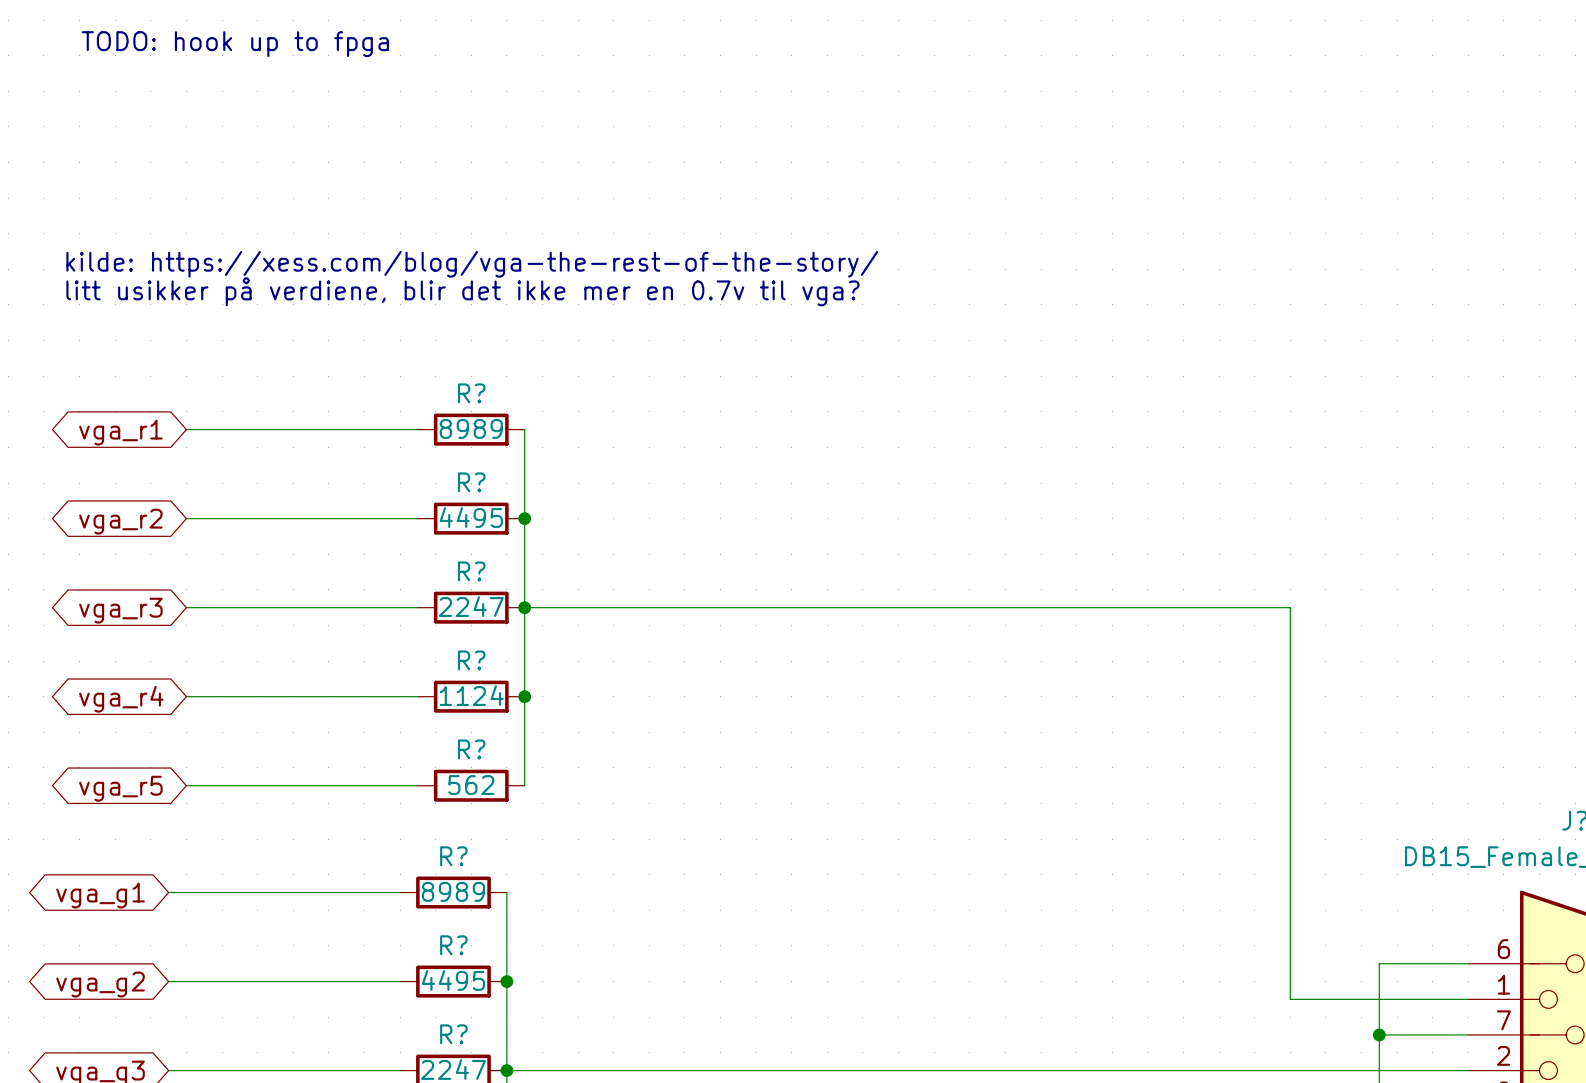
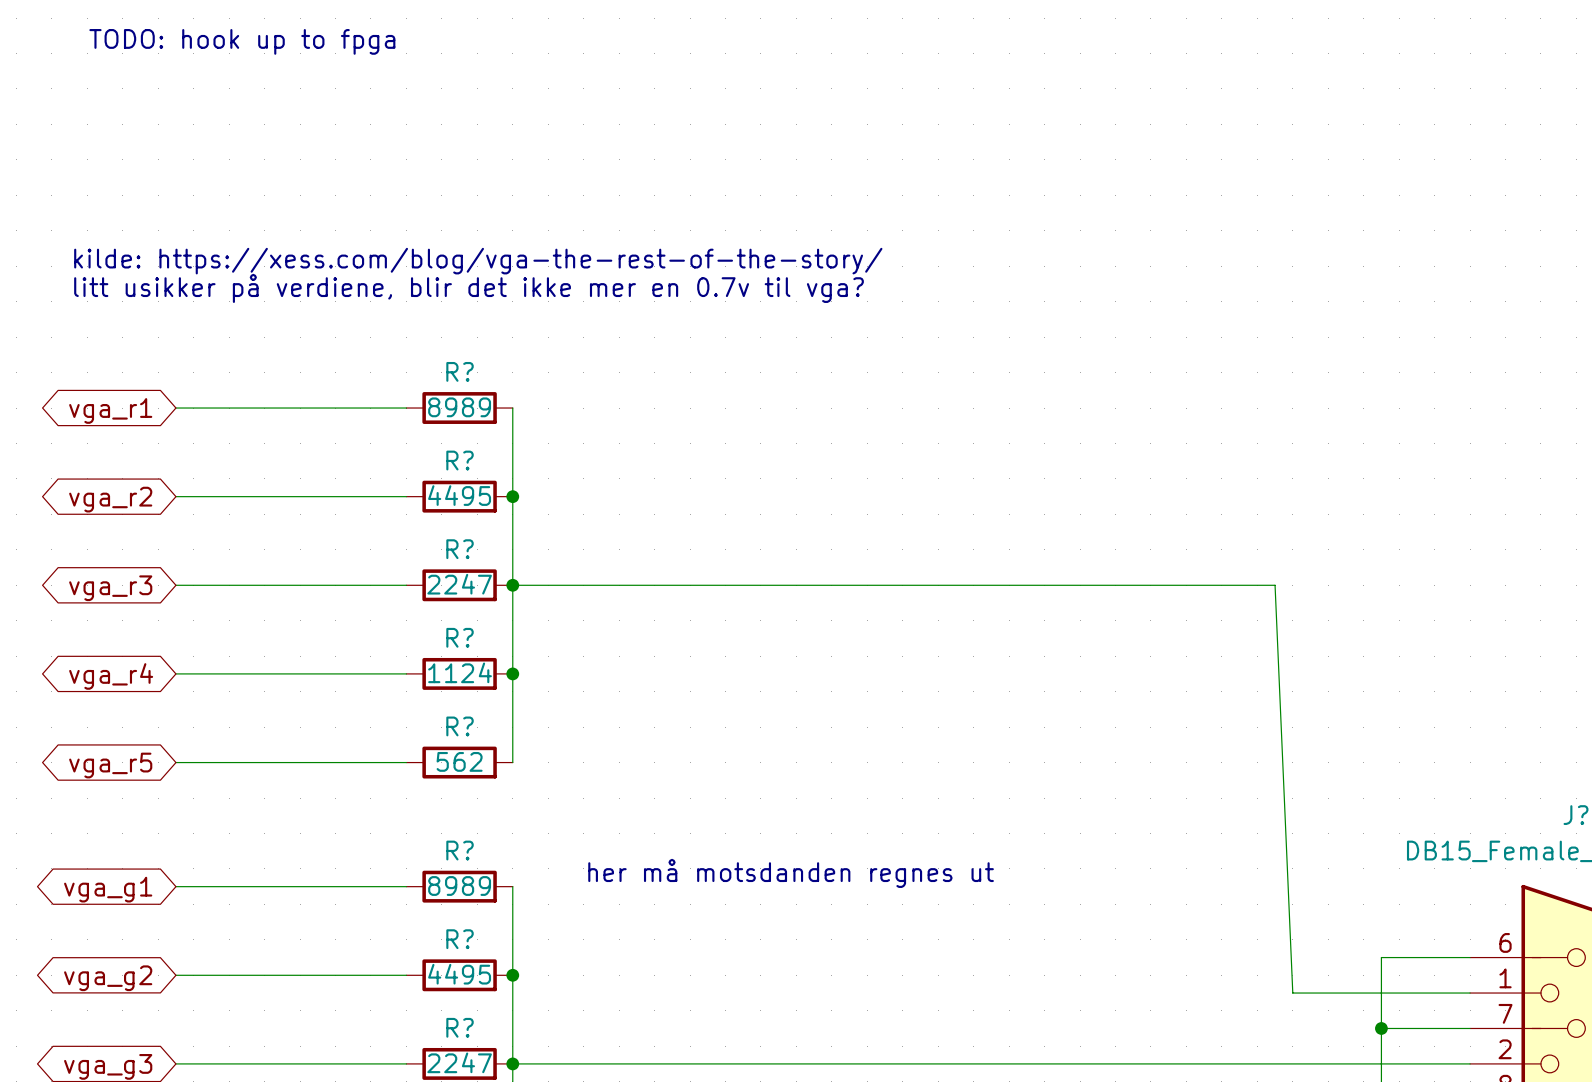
wire: (186, 429) (417, 429) -> (175, 408) (406, 408)
R? position: (471, 429) -> (459, 408)
wire: (524, 429) (524, 785) -> (512, 408) (512, 762)
global label position: vga_r1 (120, 432) -> vga_r1 (110, 410)
wire: (186, 518) (417, 518) -> (175, 496) (406, 496)
R? position: (471, 518) -> (459, 496)
junction position: (524, 518) -> (512, 496)
global label position: vga_r2 (120, 521) -> vga_r2 (110, 499)
wire: (186, 607) (417, 607) -> (175, 585) (406, 585)
R? position: (471, 607) -> (459, 585)
wire: (524, 607) (1290, 607) (1290, 999) -> (512, 585) (1275, 585) (1292, 993)
junction position: (524, 607) -> (512, 585)
global label position: vga_r3 (120, 610) -> vga_r3 (110, 588)
wire: (186, 696) (417, 696) -> (175, 673) (406, 673)
R? position: (471, 696) -> (459, 673)
junction position: (524, 696) -> (512, 673)
global label position: vga_r4 (121, 699) -> vga_r4 (111, 676)
wire: (186, 785) (417, 785) -> (175, 762) (406, 762)
R? position: (471, 785) -> (459, 762)
global label position: vga_r5 (120, 788) -> vga_r5 (110, 765)
text: none -> her må motsdanden regnes ut (791, 873)

